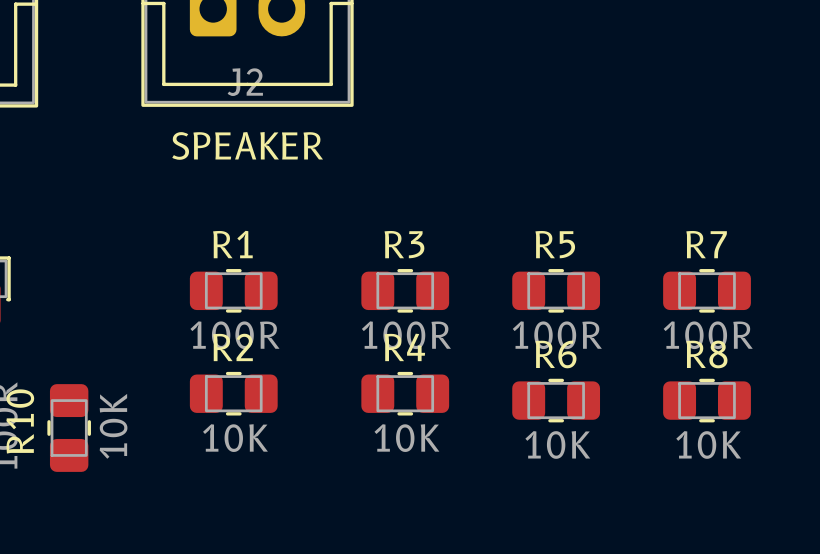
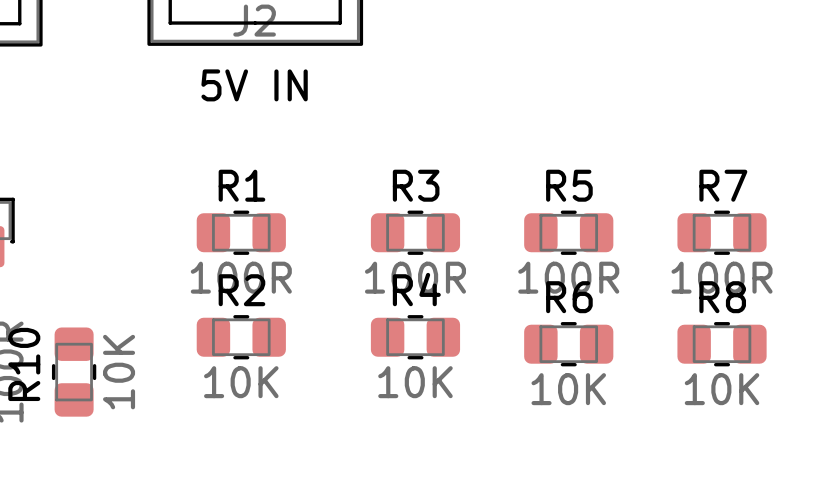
J2 value: SPEAKER (247, 145) -> 5V IN (254, 85)

